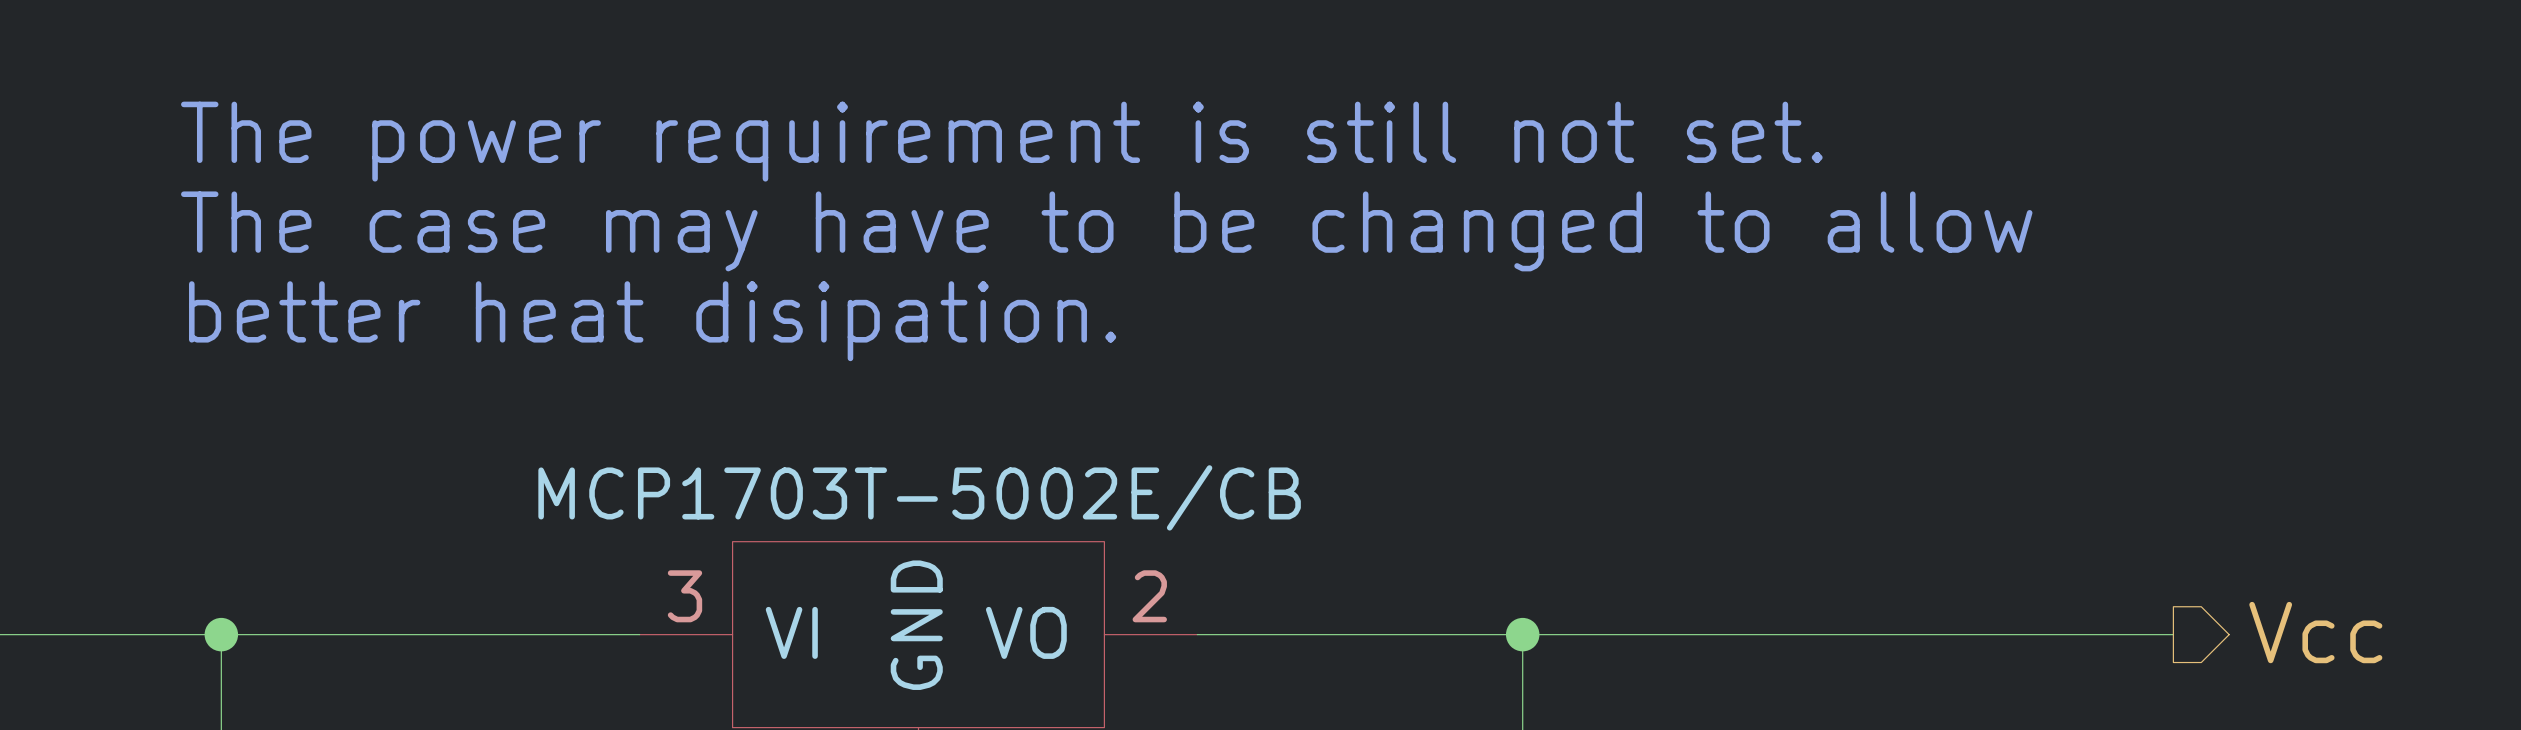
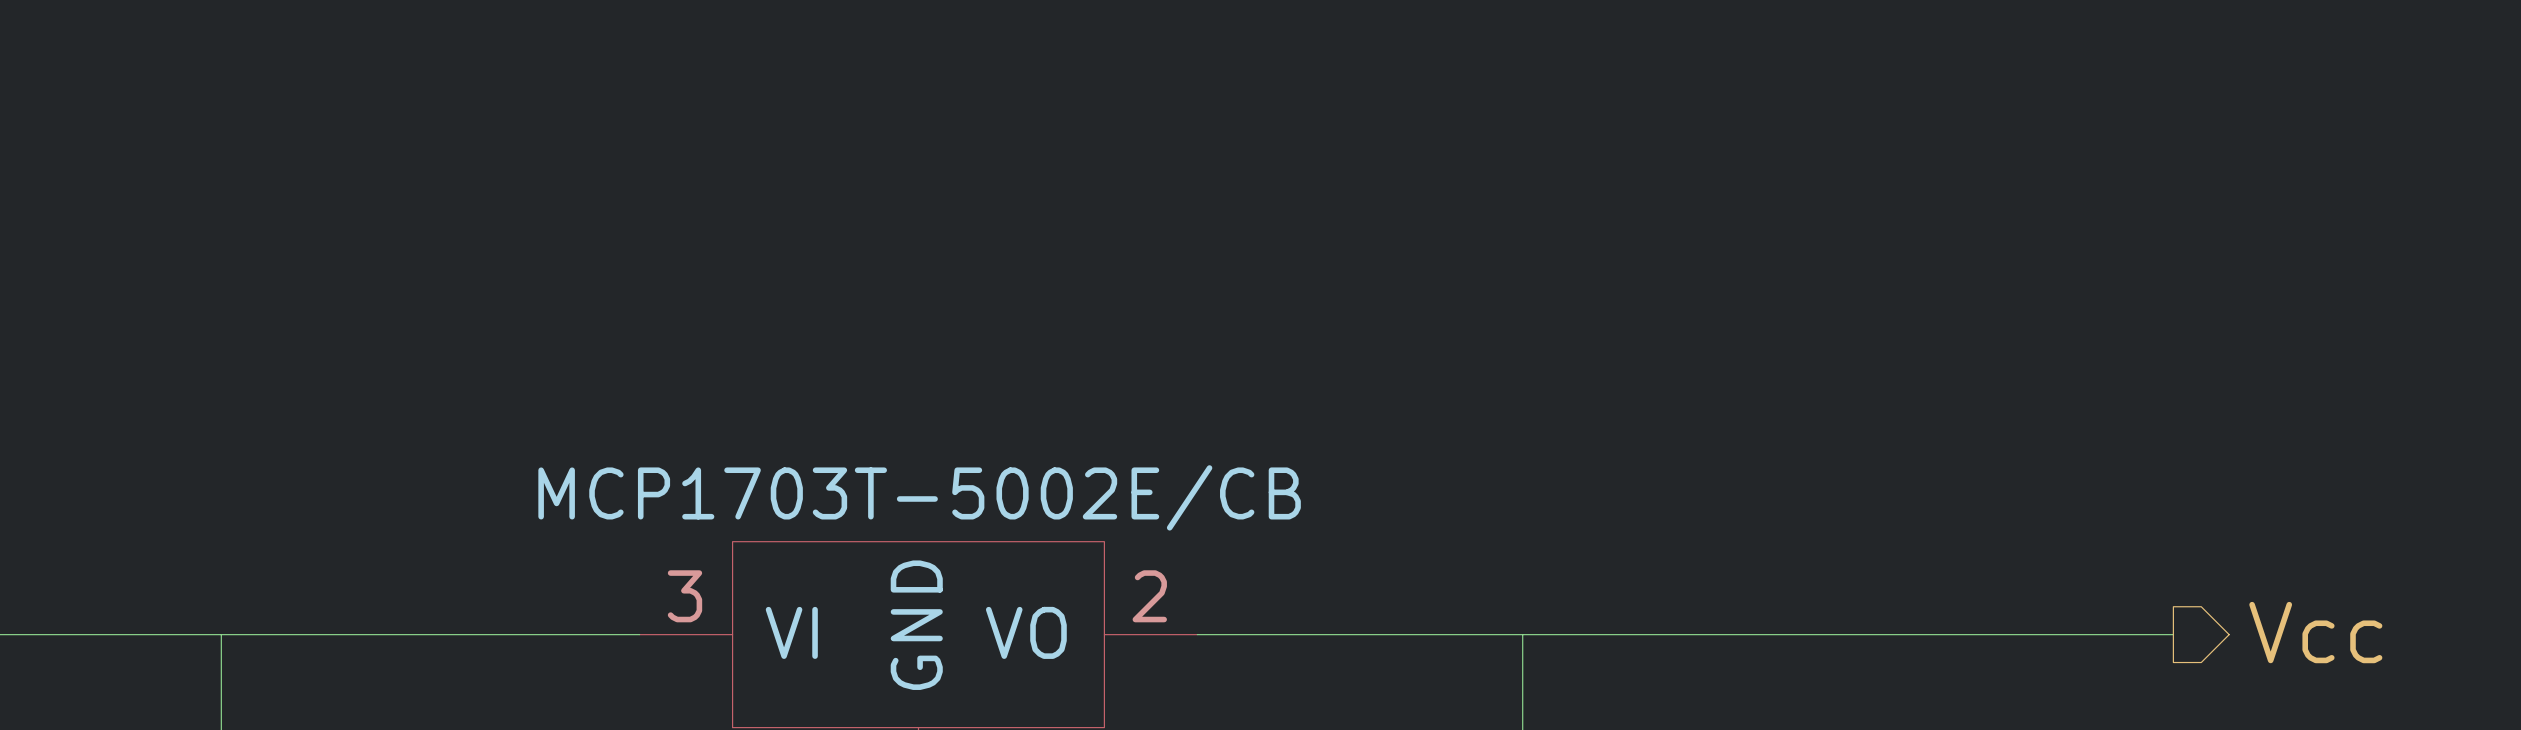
text: The power requirement is still not set. (1001, 141) -> none
text: The case may have to be changed to allow (1106, 231) -> none
text: better heat disipation. (652, 321) -> none
junction: (221, 634) -> none
junction: (1522, 634) -> none

